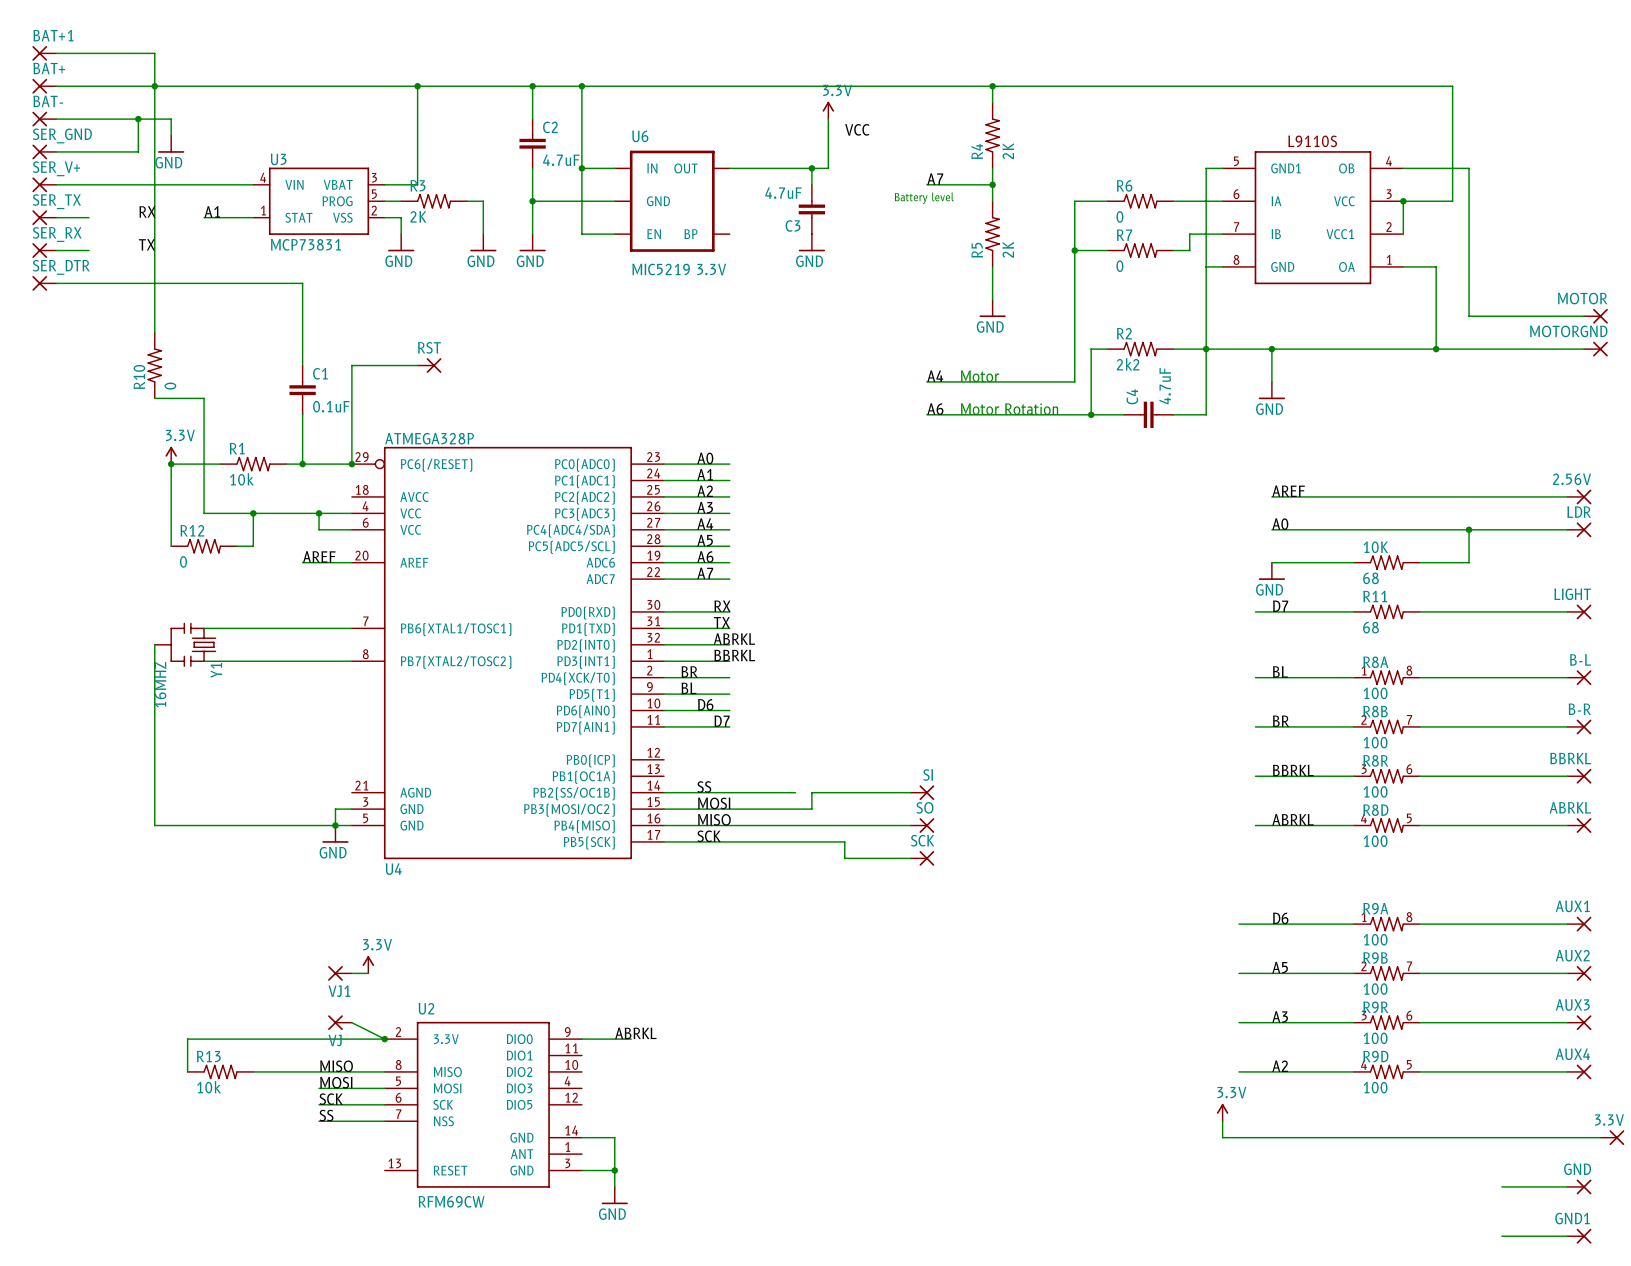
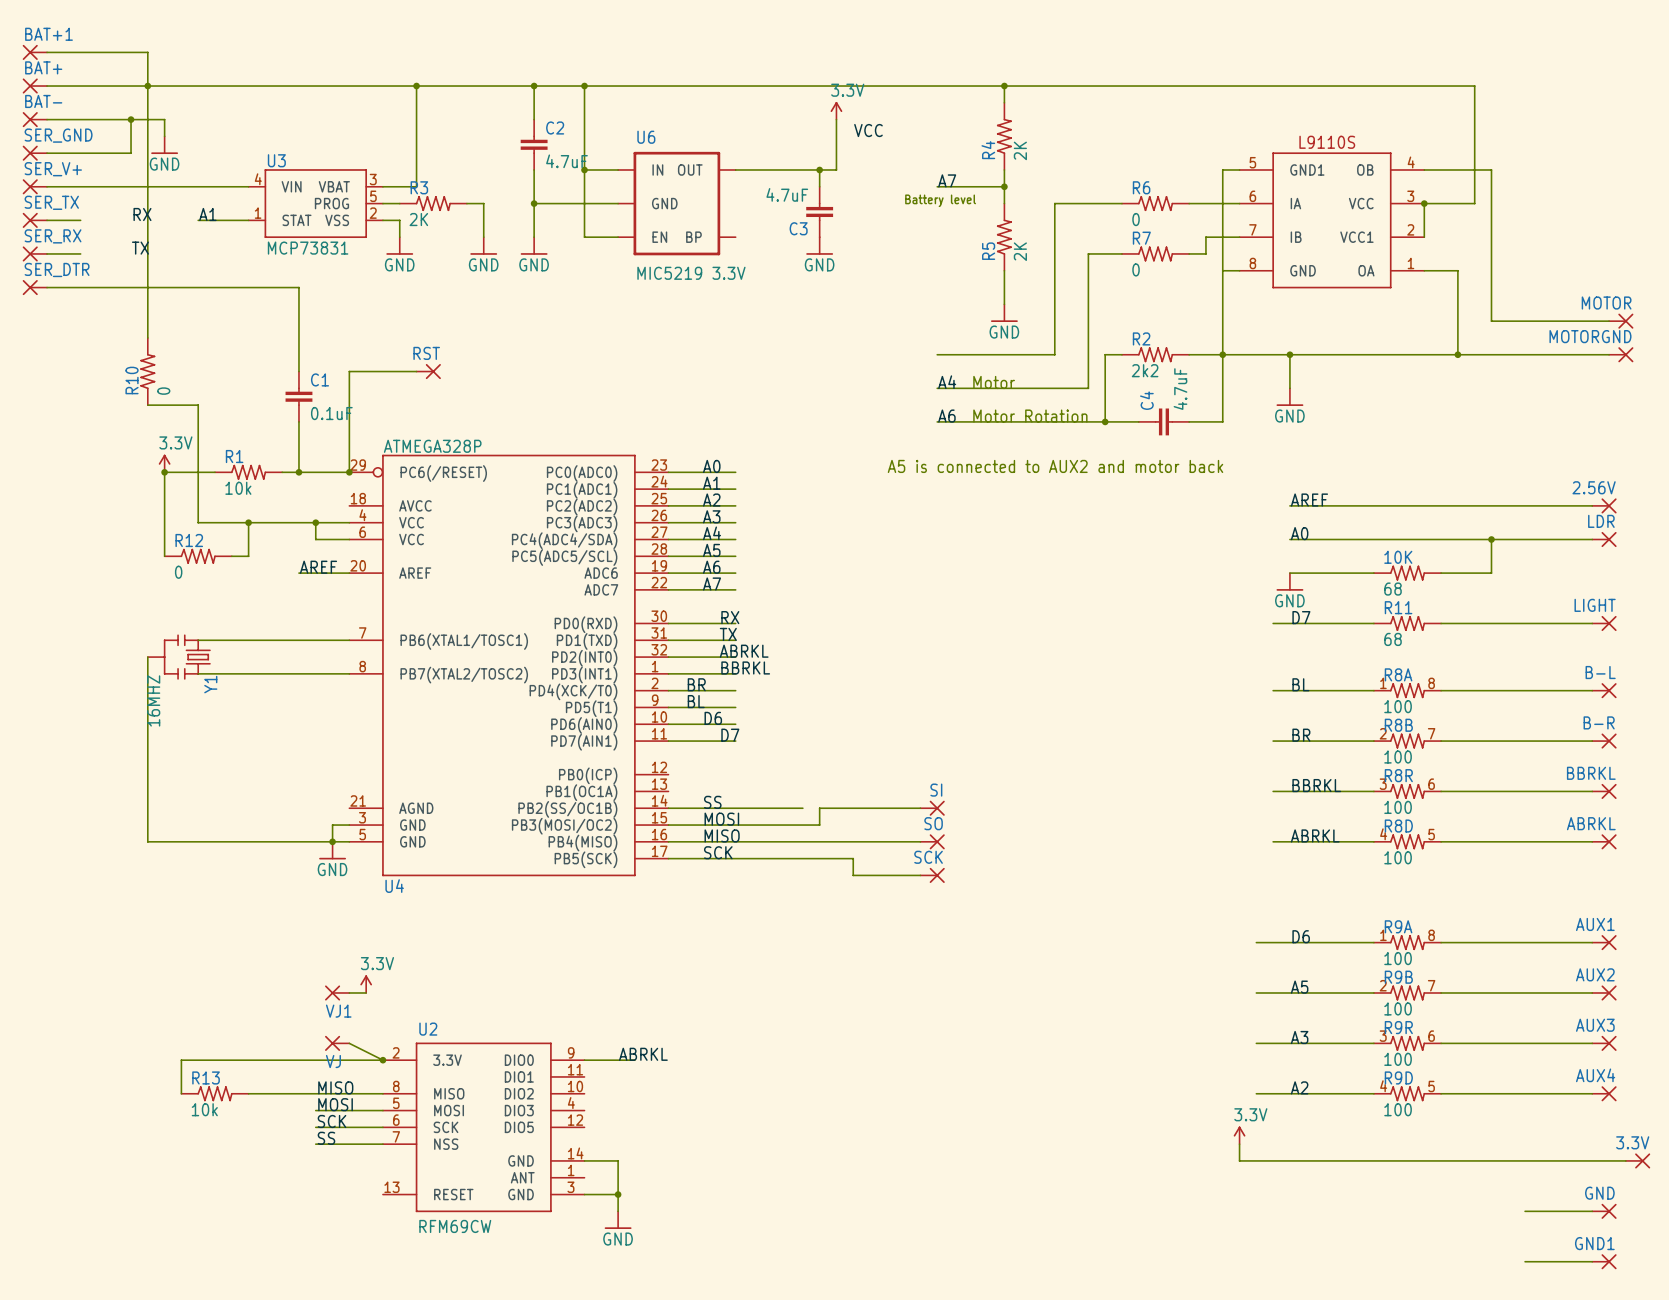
wire: (1074, 201) (1074, 250) -> (1088, 203) (1054, 203) (1054, 354) (937, 354)
junction: (1074, 250) -> none
text: none -> A5 is connected to AUX2 and motor back (1055, 466)

